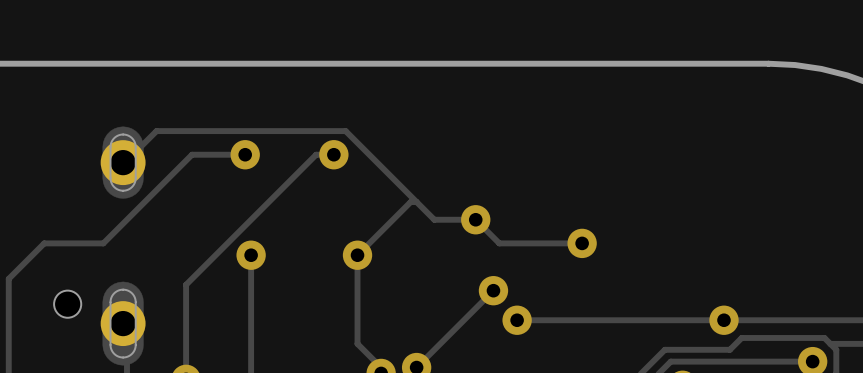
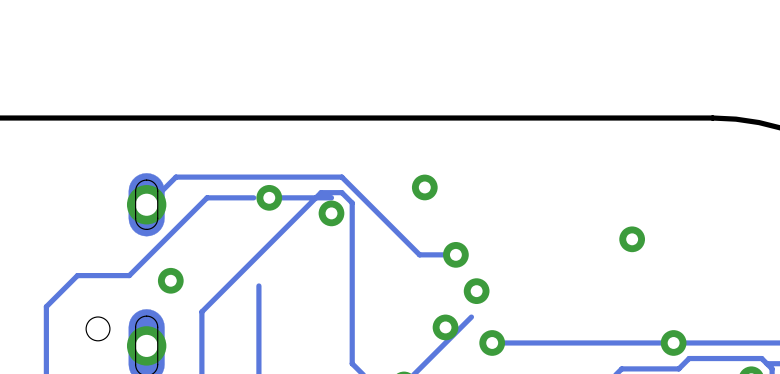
via: none -> (424, 187)
via position: (245, 154) -> (269, 197)
via position: (333, 154) -> (331, 213)
track: (416, 202) (410, 202) (357, 255) -> (269, 197) (315, 197) (321, 192) (341, 192) (352, 203) (352, 285)
via: none -> (632, 239)
track: (475, 219) (499, 243) (582, 243) -> none
via: (582, 243) -> none
via: none -> (170, 280)
via: (251, 255) -> none
via: (357, 255) -> none
via: none -> (476, 291)
via: (493, 290) -> none
via: none -> (445, 327)

